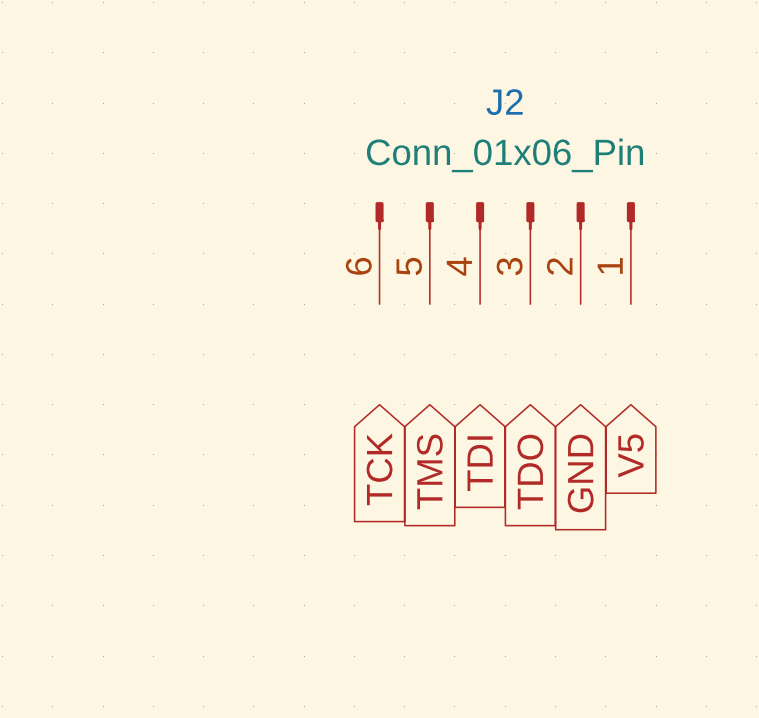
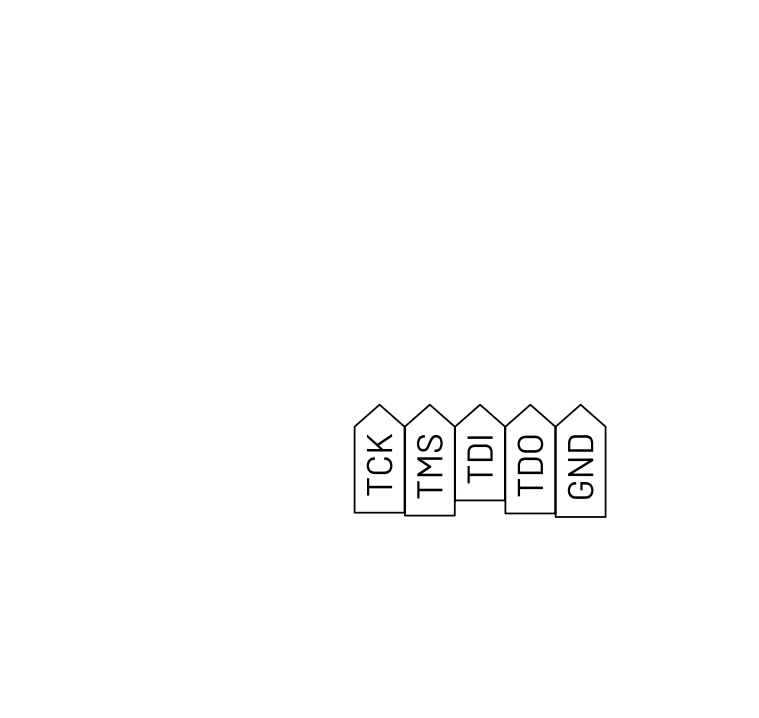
J2: Conn_01x06_Pin (505, 253) -> none
global label: V5 (631, 456) -> none

